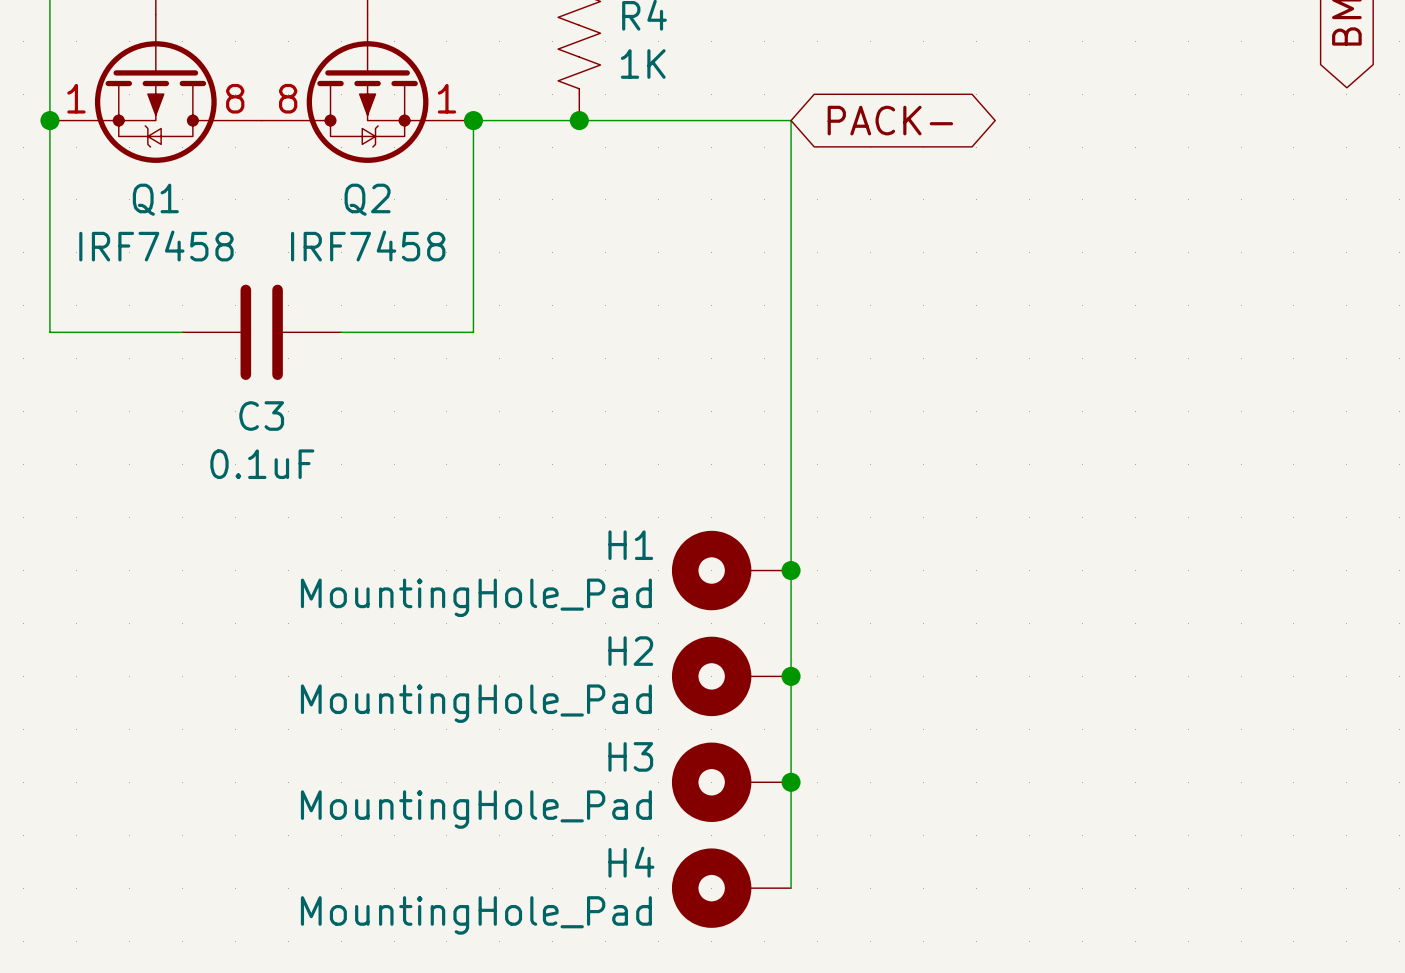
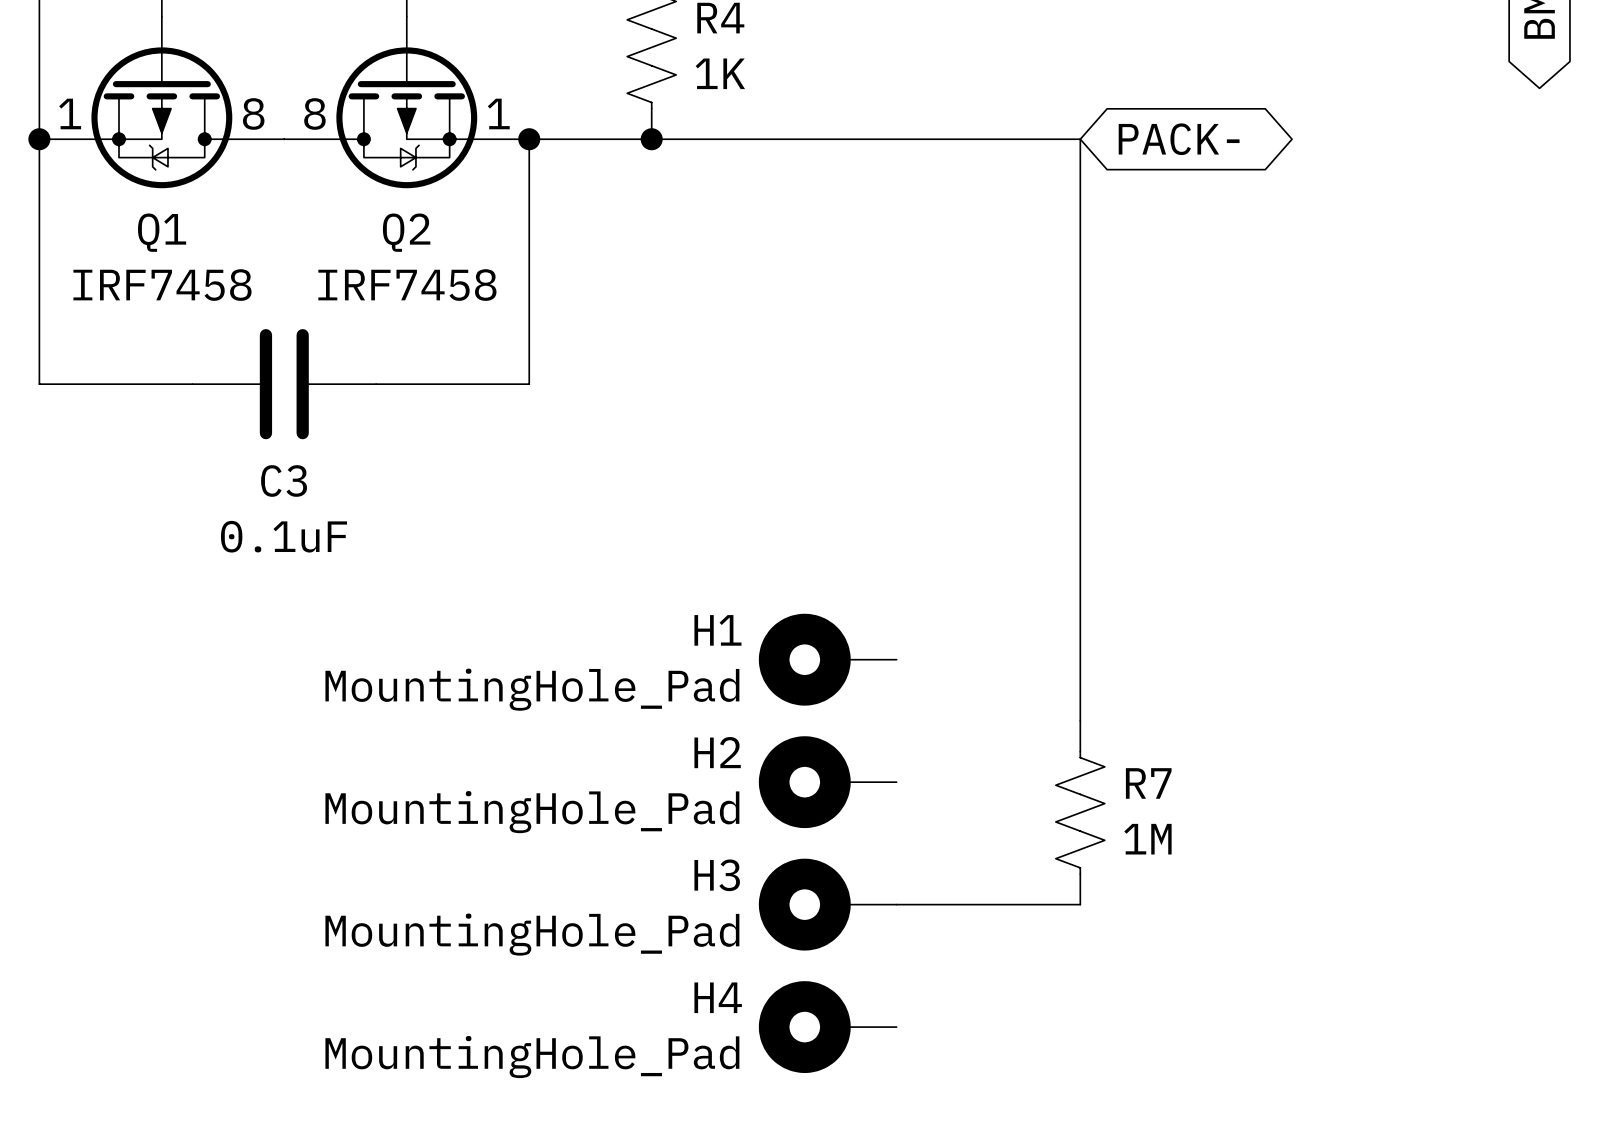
wire: (791, 120) (791, 888) -> (896, 139) (1080, 139) (1080, 720)
global label position: PACK- (890, 120) -> PACK- (1179, 139)
junction: (791, 570) -> none
junction: (791, 676) -> none
R7: none -> 1M (1080, 812)
wire: none -> (896, 904) (1080, 904)
junction: (791, 782) -> none

